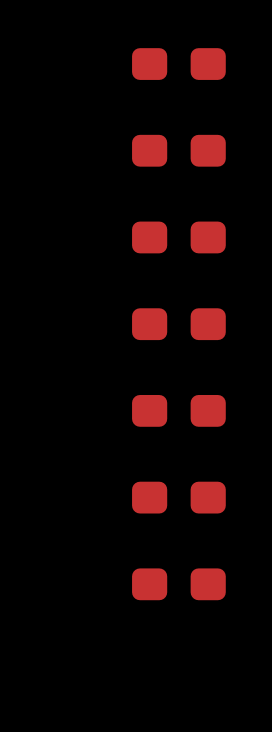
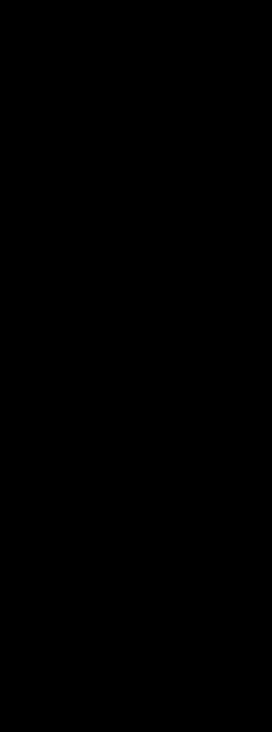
part: (178, 64) -> none
part: (178, 150) -> none
part: (178, 237) -> none
part: (178, 324) -> none
part: (178, 410) -> none
part: (178, 497) -> none
part: (178, 584) -> none

